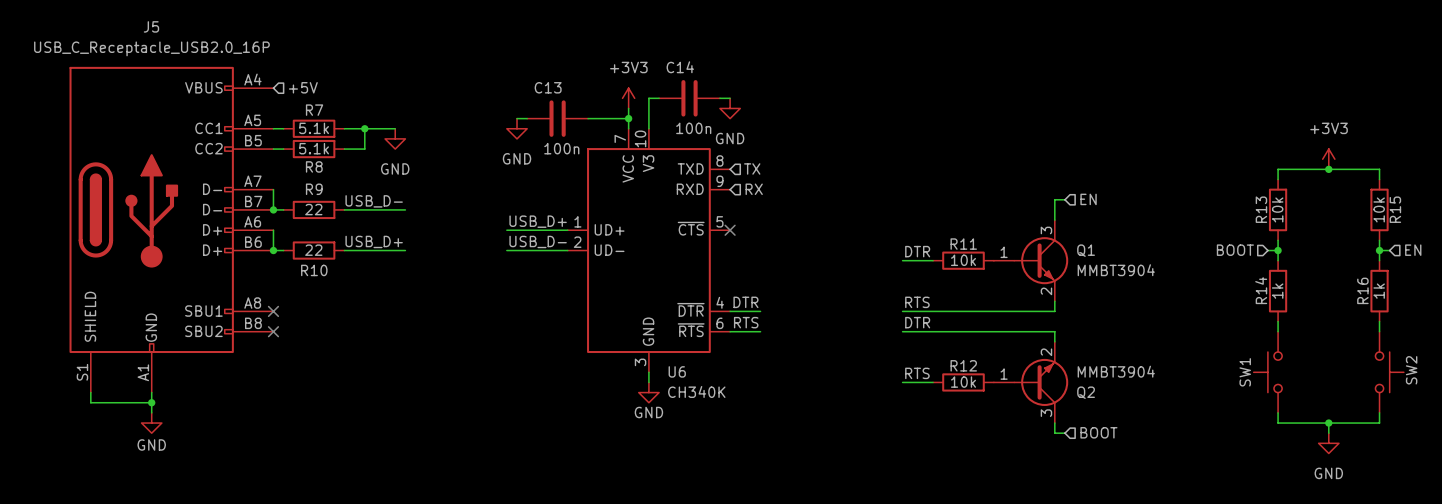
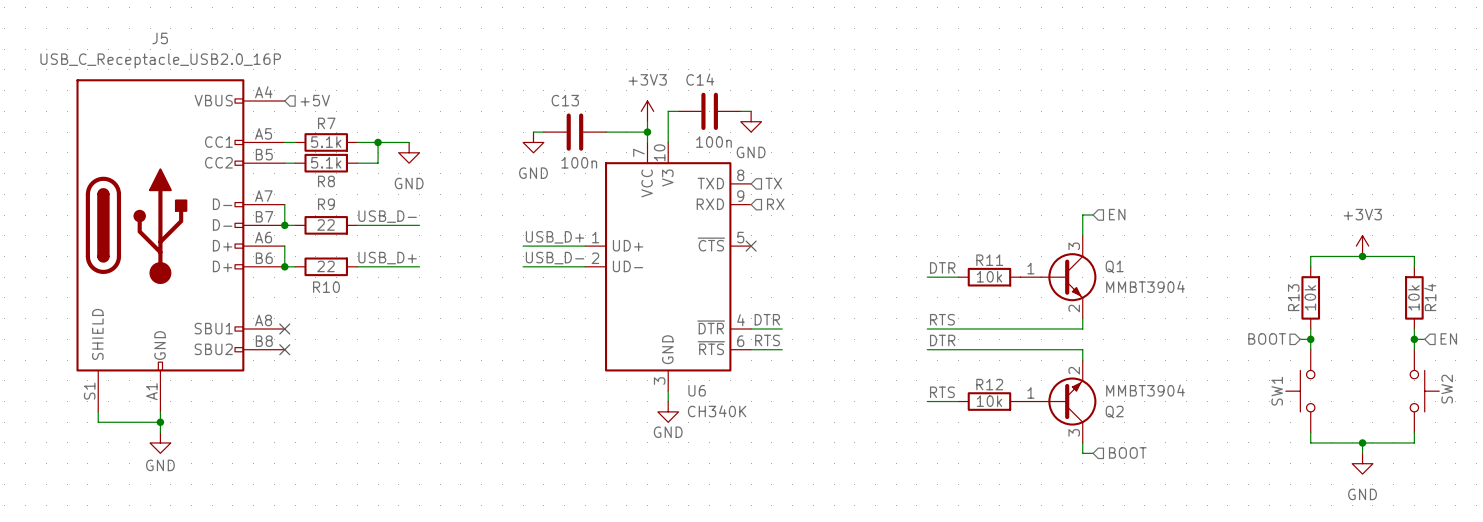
power symbol position: +3V3 (1328, 159) -> +3V3 (1362, 246)
junction: (1328, 169) -> none
wire: (1278, 179) (1278, 169) (1379, 169) (1379, 179) -> none
R13 position: (1278, 209) -> (1310, 297)
R15: 10k (1379, 209) -> none
wire: none -> (1310, 256) (1414, 256)
junction: none -> (1362, 256)
hierarchical label position: BOOT (1235, 250) -> BOOT (1267, 338)
junction: (1278, 250) -> none
junction: (1379, 250) -> none
hierarchical label position: EN (1413, 250) -> EN (1448, 338)
R14 name position: R14 (1261, 290) -> R14 (1430, 297)
R14 value: 1k (1277, 291) -> 10k (1413, 297)
R14 position: (1278, 291) -> (1414, 297)
R16: 1k (1379, 291) -> none
junction: none -> (1310, 339)
junction: none -> (1414, 339)

